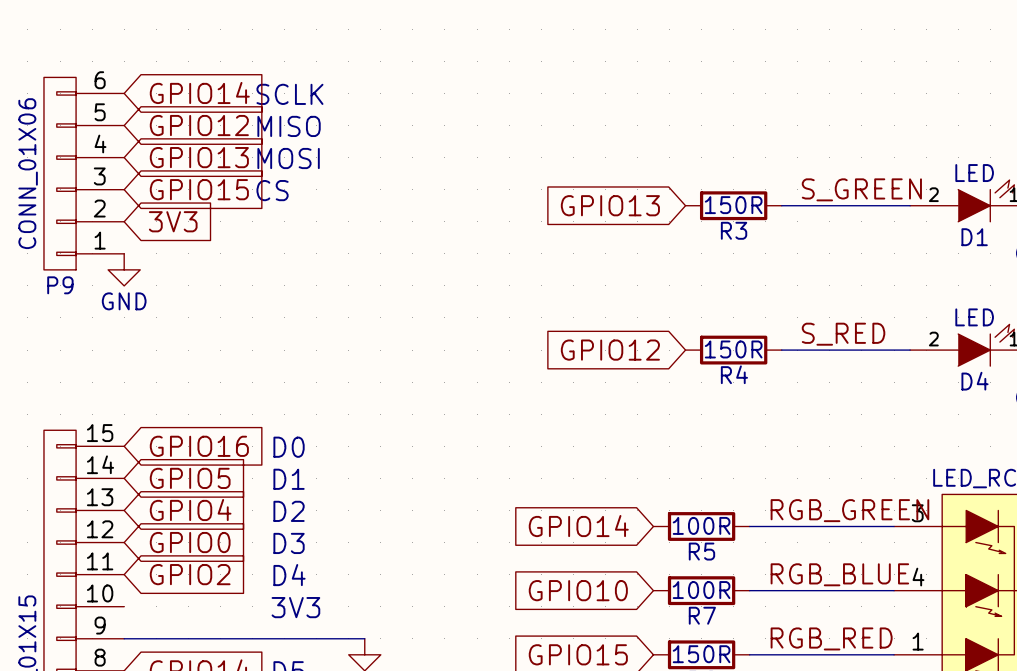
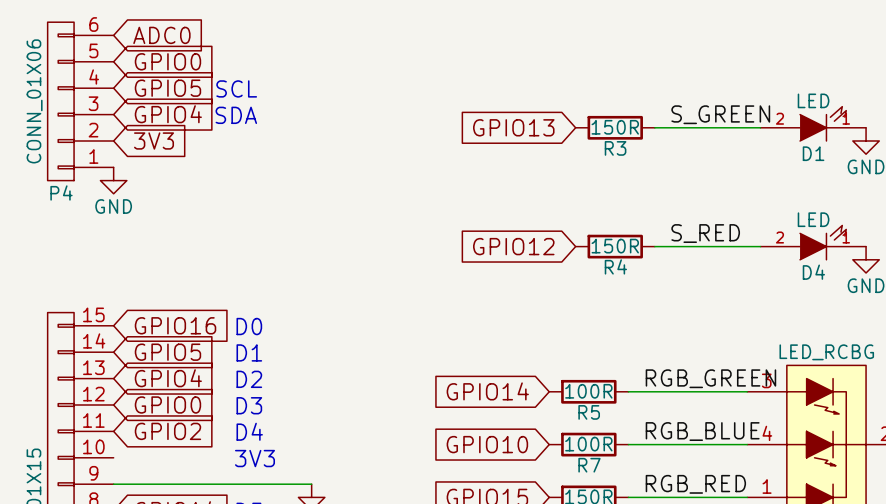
global label: GPIO14 (199, 92) -> ADC0 (161, 35)
text: SCLK (289, 94) -> none
global label: GPIO12 (199, 125) -> GPIO0 (167, 61)
text: MISO (289, 126) -> none
global label: GPIO13 (199, 157) -> GPIO5 (167, 88)
text: none -> SCL (236, 88)
text: MOSI (288, 158) -> none
global label: GPIO15 (199, 189) -> GPIO4 (168, 114)
text: CS (272, 190) -> none
text: none -> SDA (236, 115)
P9 name: P9 (60, 285) -> P4 (61, 192)

